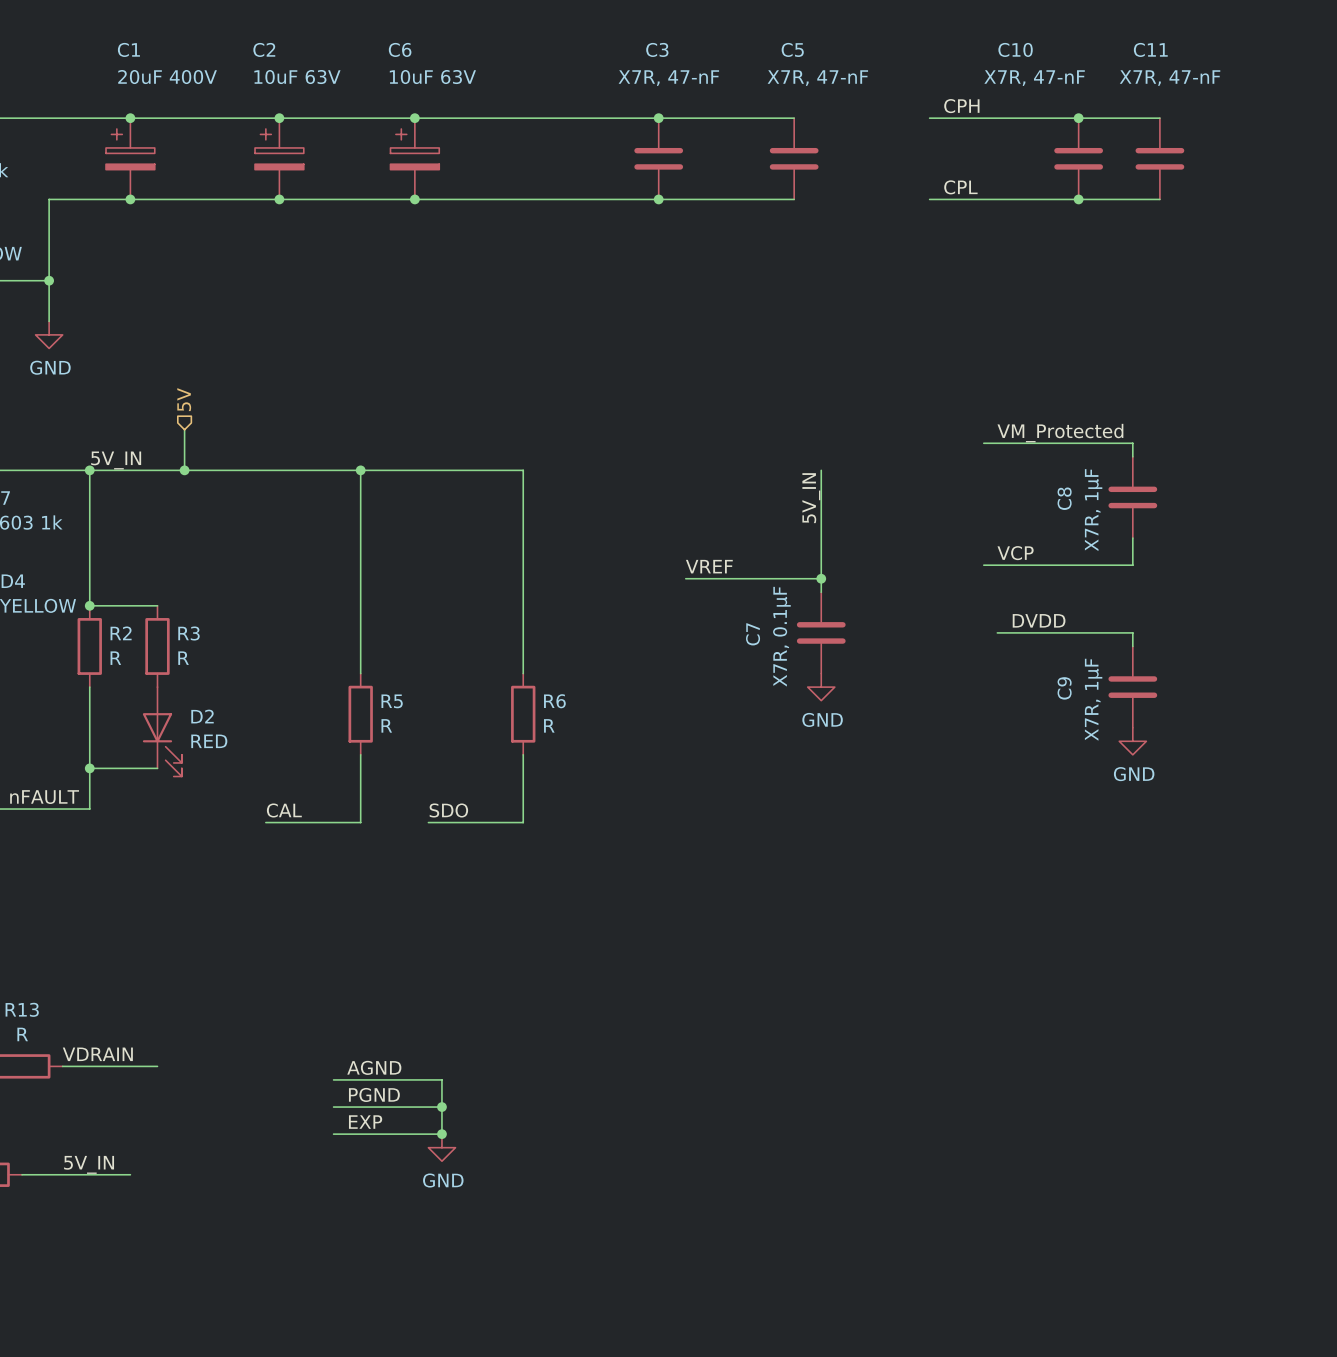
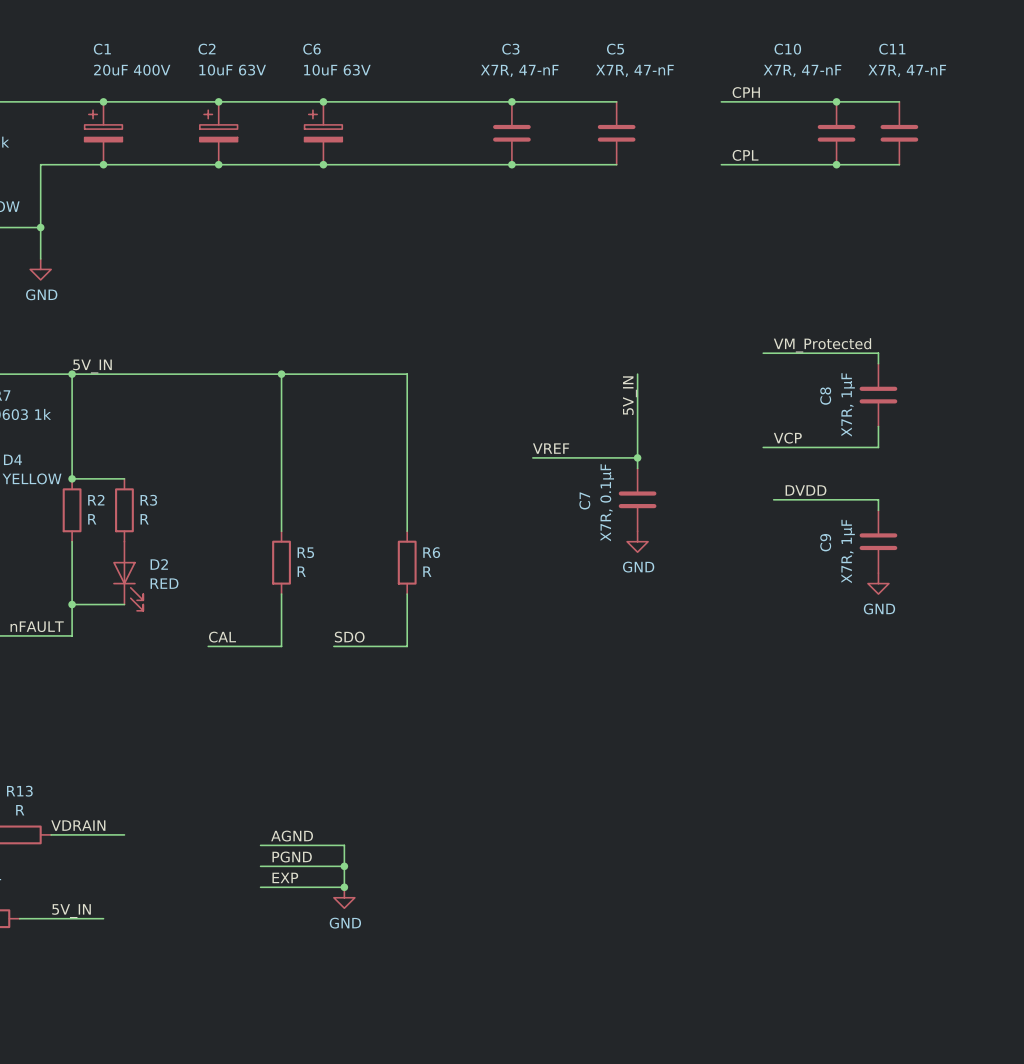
hierarchical label: 5V (184, 399) -> none
wire: (184, 429) (184, 470) -> none
junction: (184, 470) -> none

